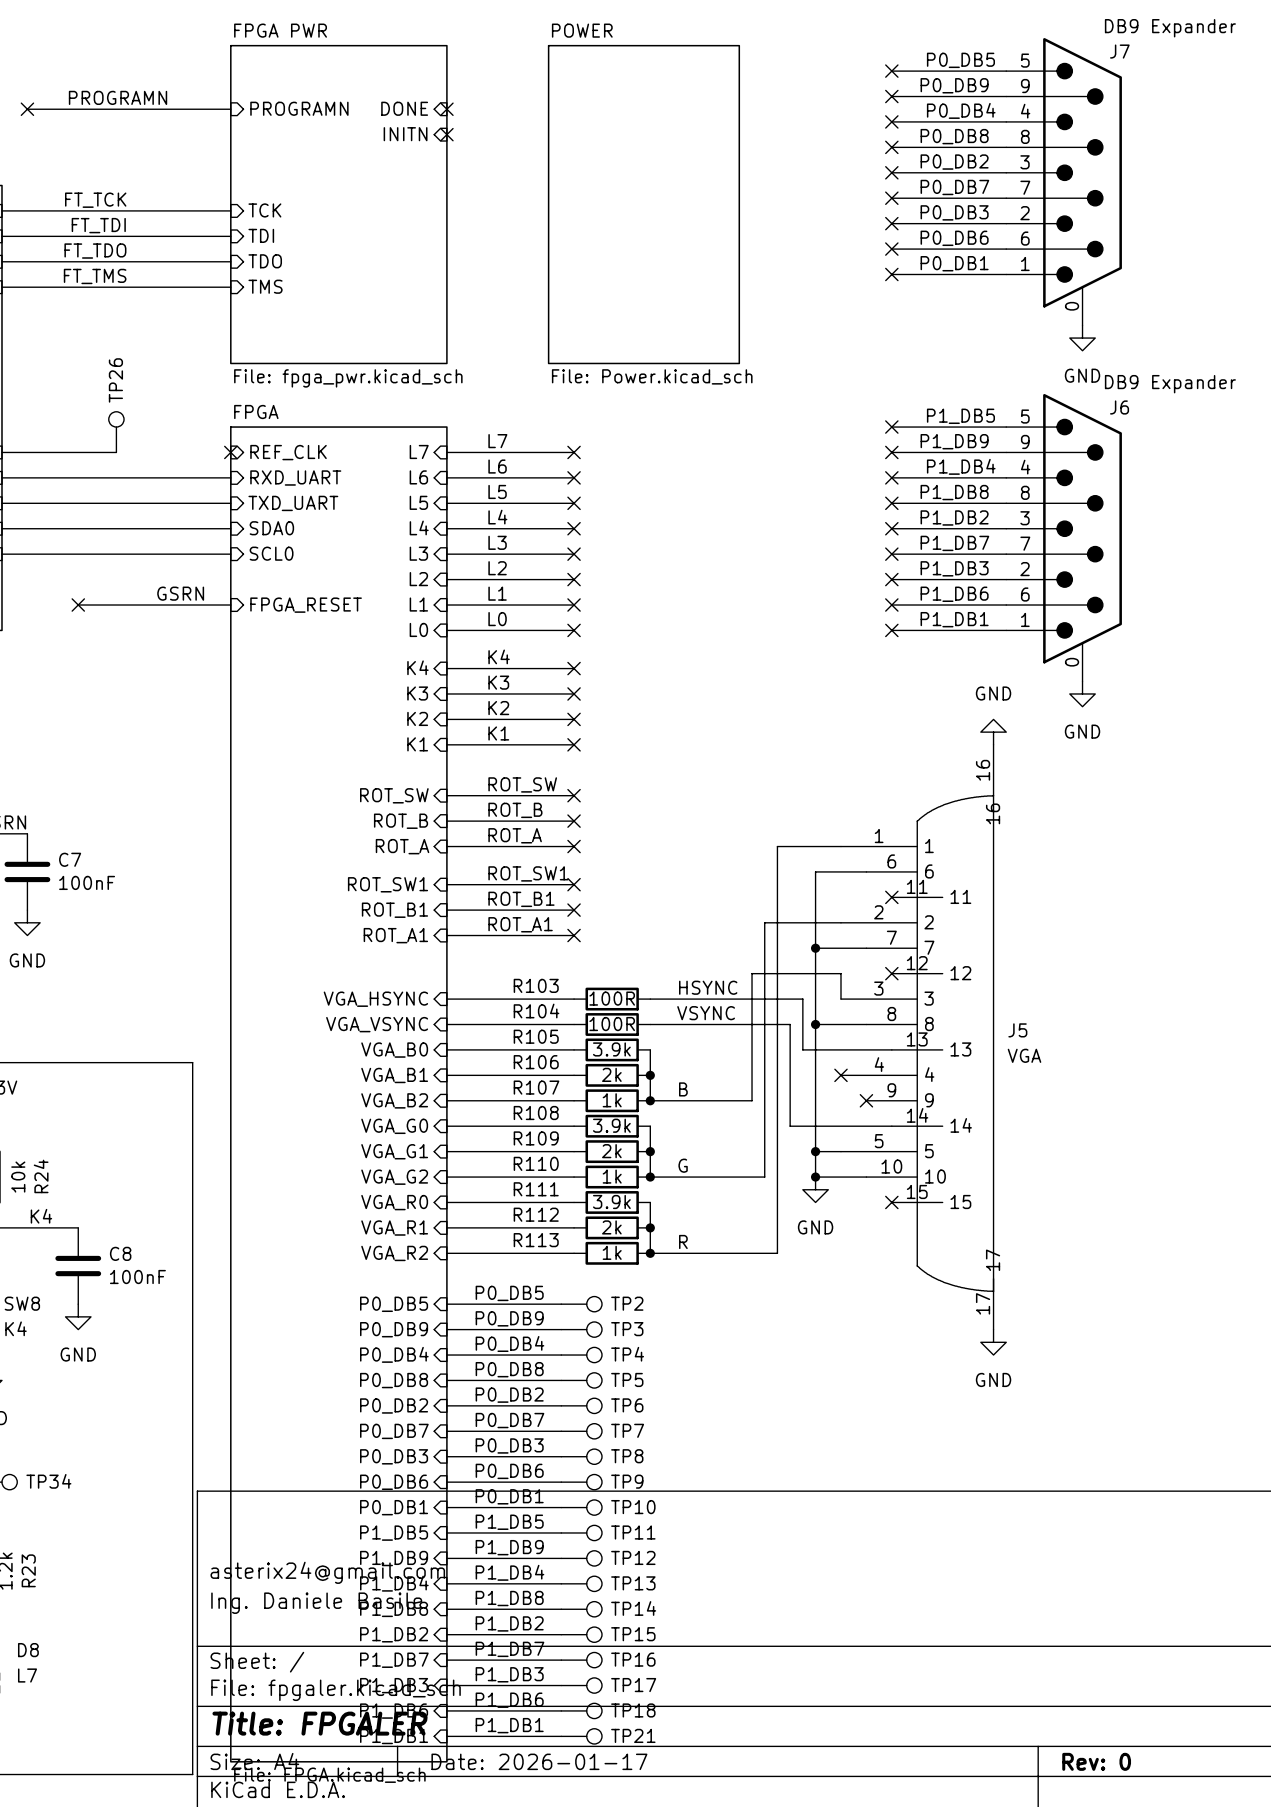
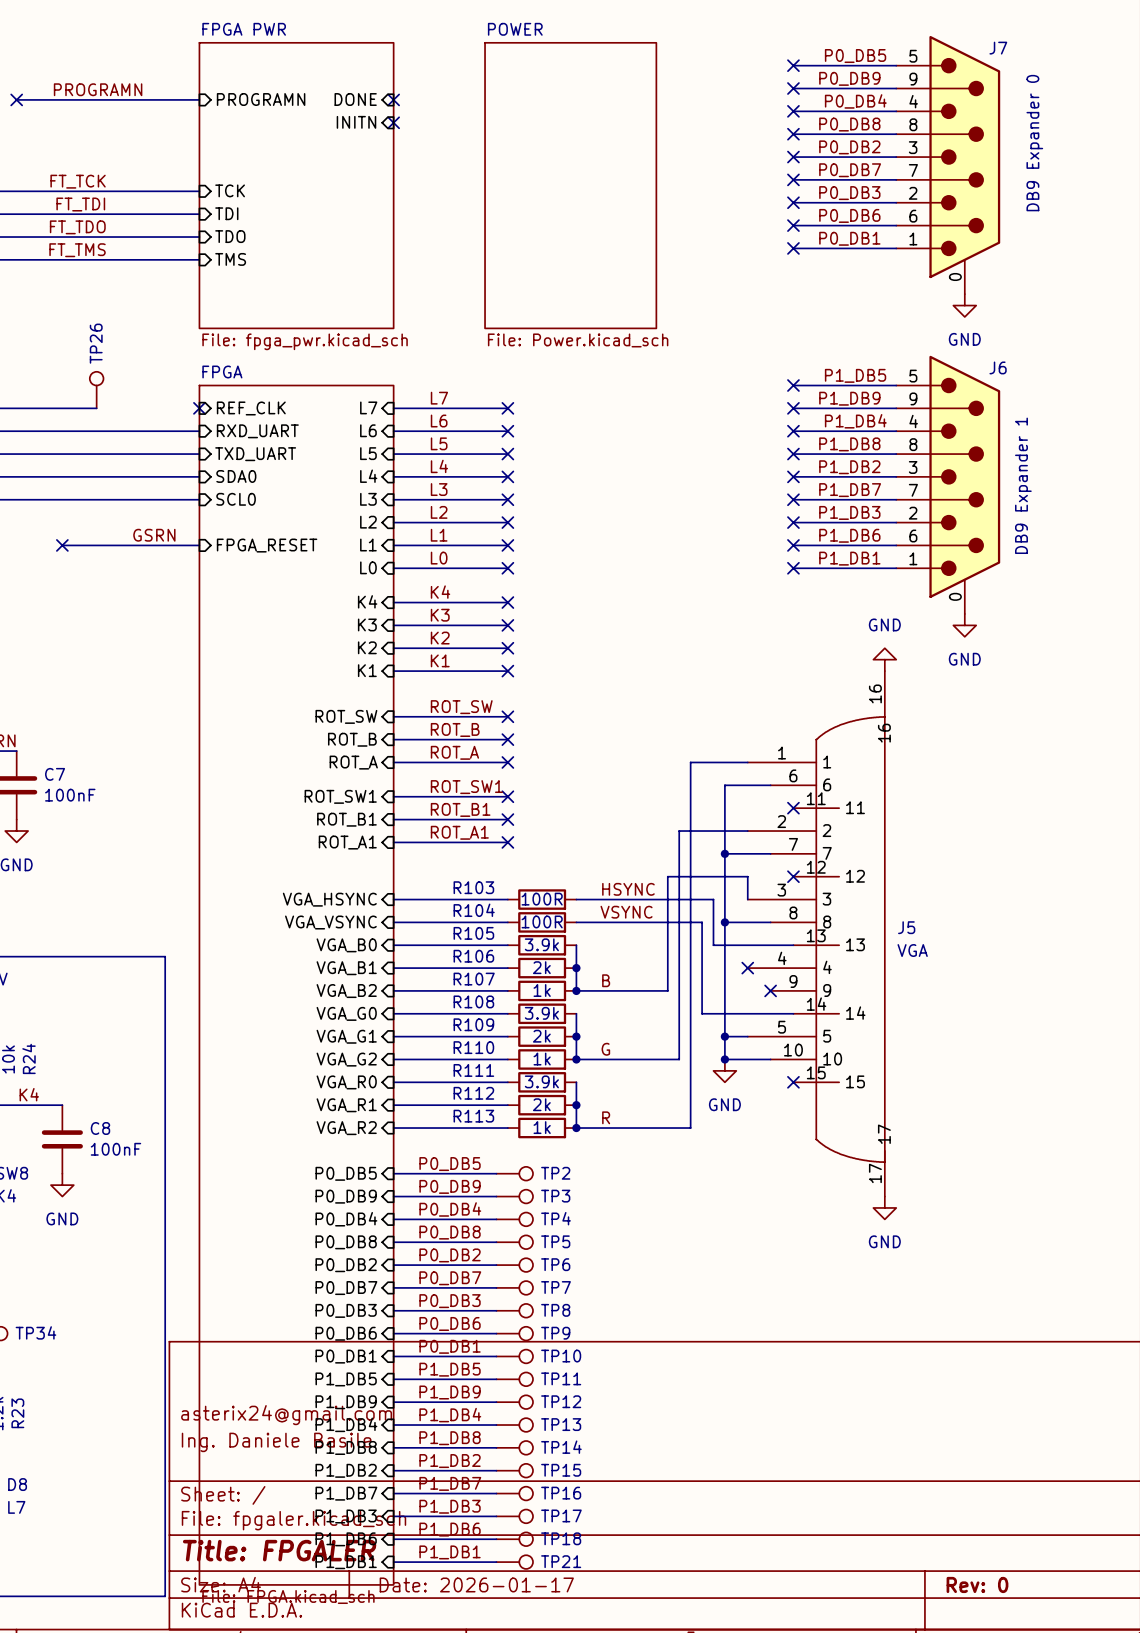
J7 value: DB9 Expander (1170, 28) -> DB9 Expander 0 (1034, 143)
J6 value: DB9 Expander (1170, 384) -> DB9 Expander 1 (1023, 485)

